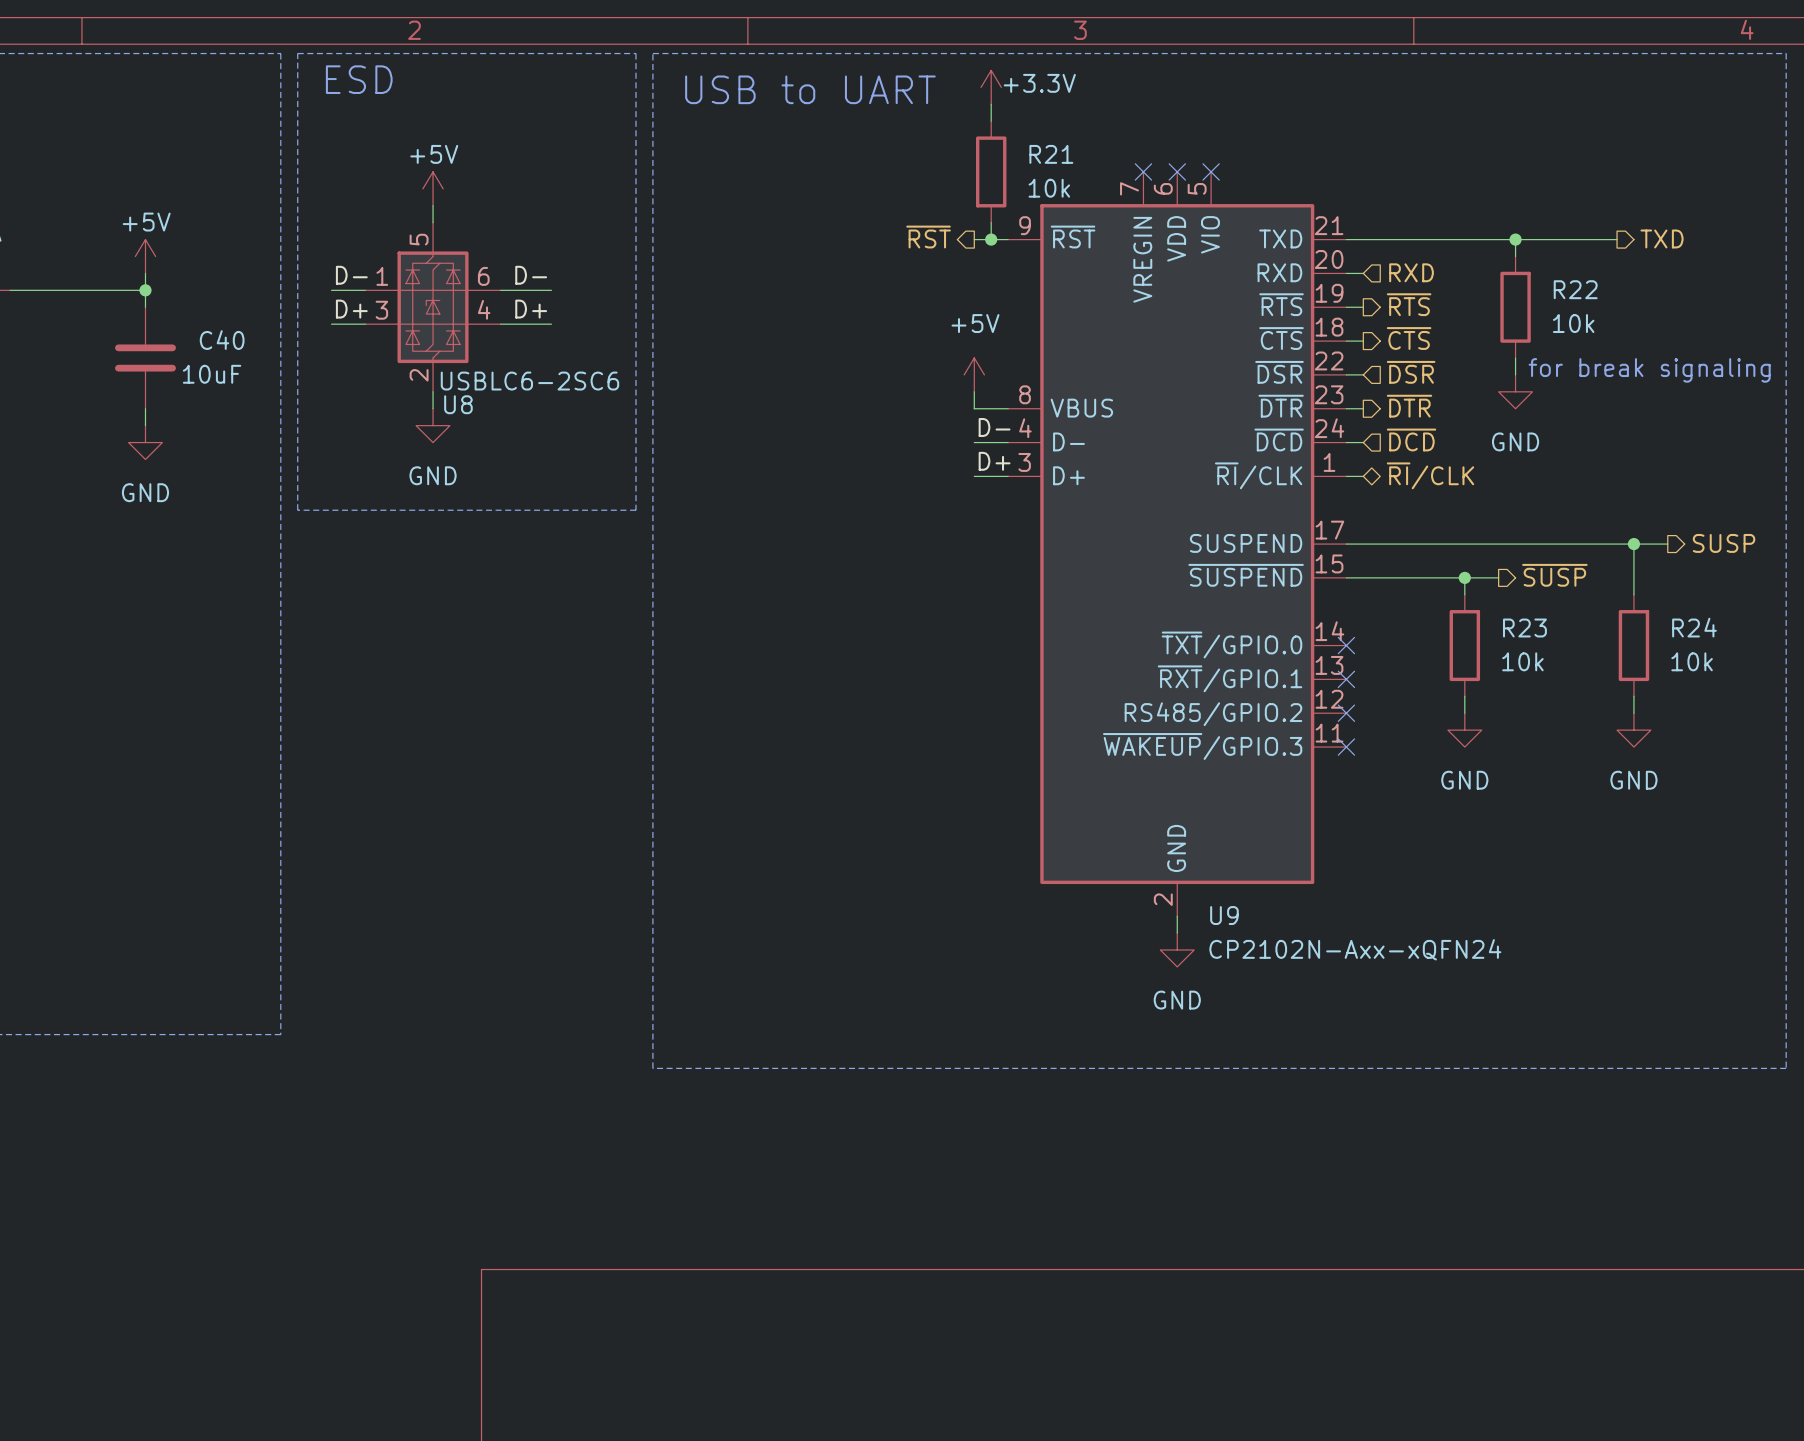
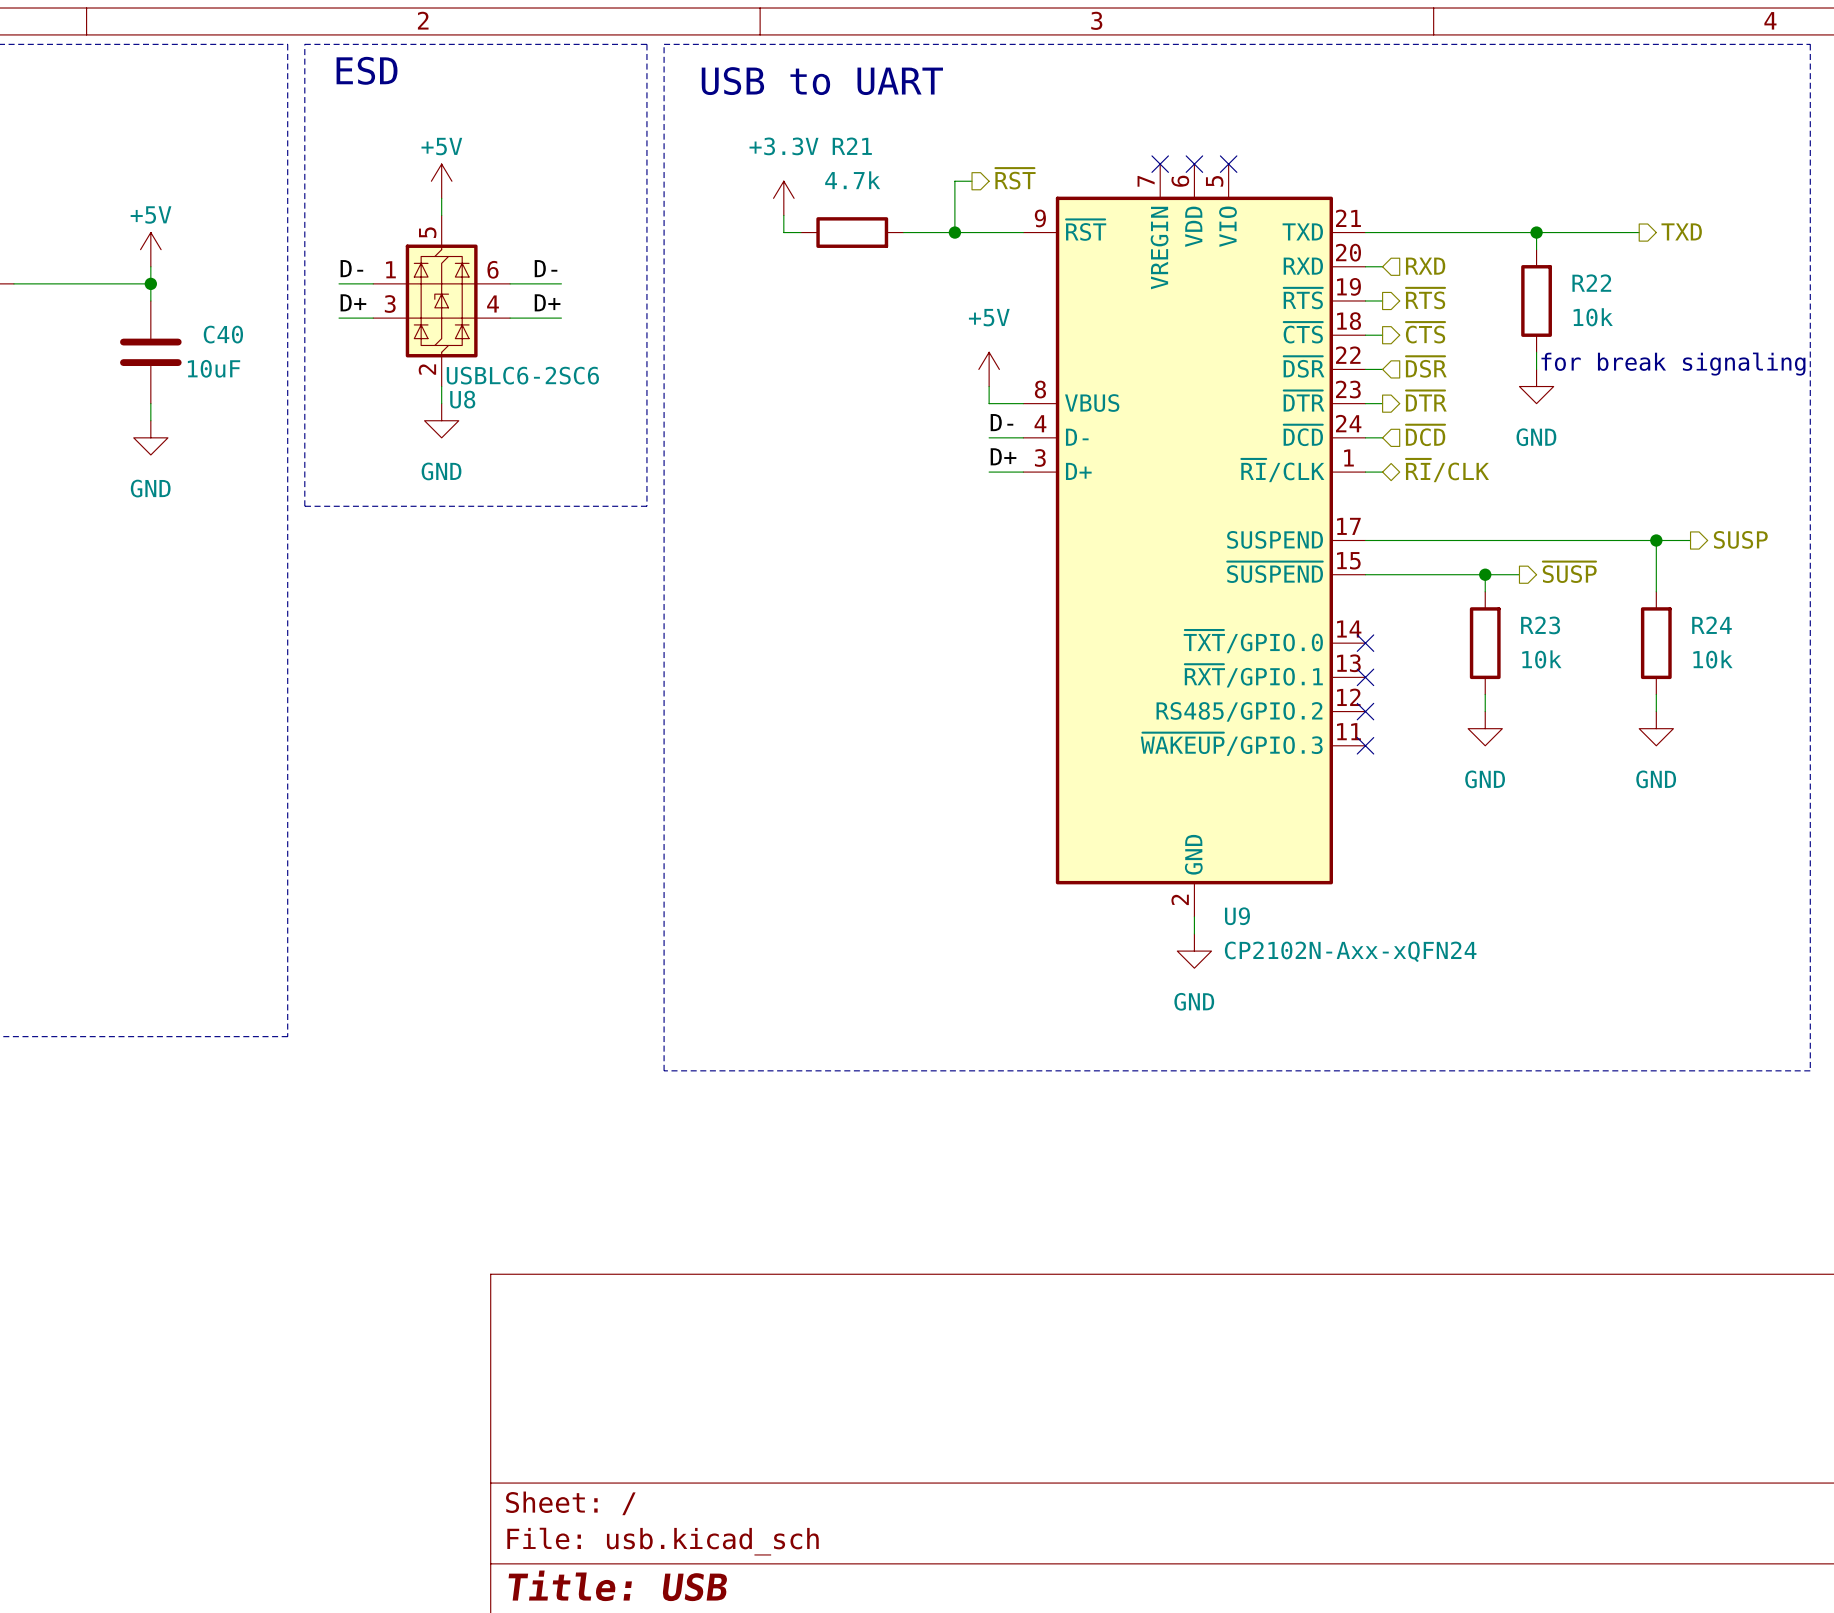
power symbol text position: +3.3V (1039, 83) -> +3.3V (784, 146)
power symbol position: +3.3V (991, 87) -> +3.3V (783, 198)
wire: (991, 104) (991, 121) -> none
R21 name position: R21 (1051, 154) -> R21 (852, 146)
R21 rotation: 0° (991, 171) -> 90° clockwise (852, 232)
R21 position: (991, 171) -> (852, 232)
wire: none -> (972, 181) (954, 181) (954, 232)
R21 value: 10k (1049, 188) -> 4.7k (852, 180)
wire: none -> (783, 215) (783, 232) (800, 232)
wire: (991, 222) (991, 239) -> none
hierarchical label rotation: 0° (928, 237) -> 180° (1015, 178)
hierarchical label position: ~{RST} (928, 237) -> ~{RST} (1015, 178)
wire: none -> (903, 232) (989, 232)
junction position: (991, 239) -> (954, 232)

